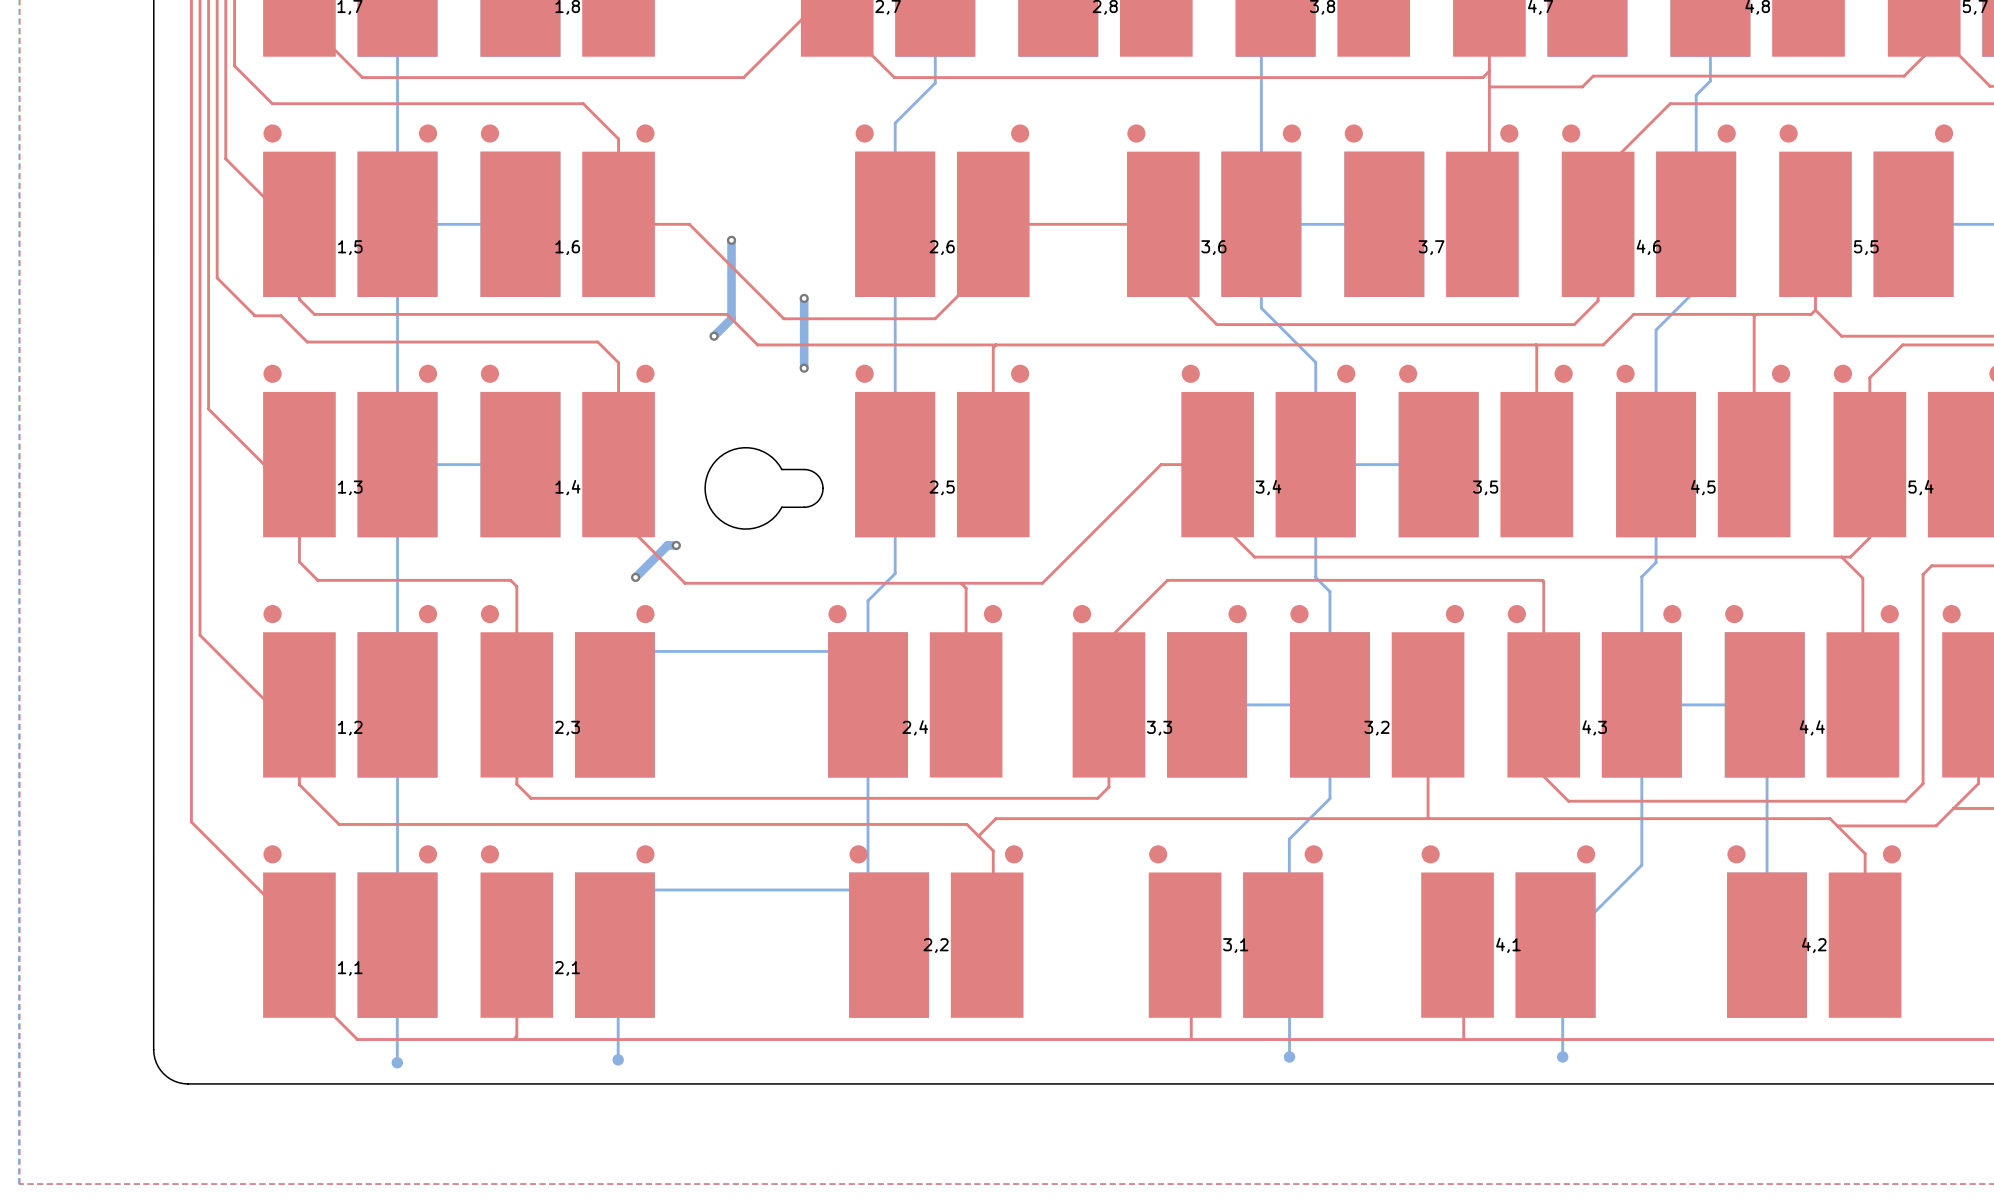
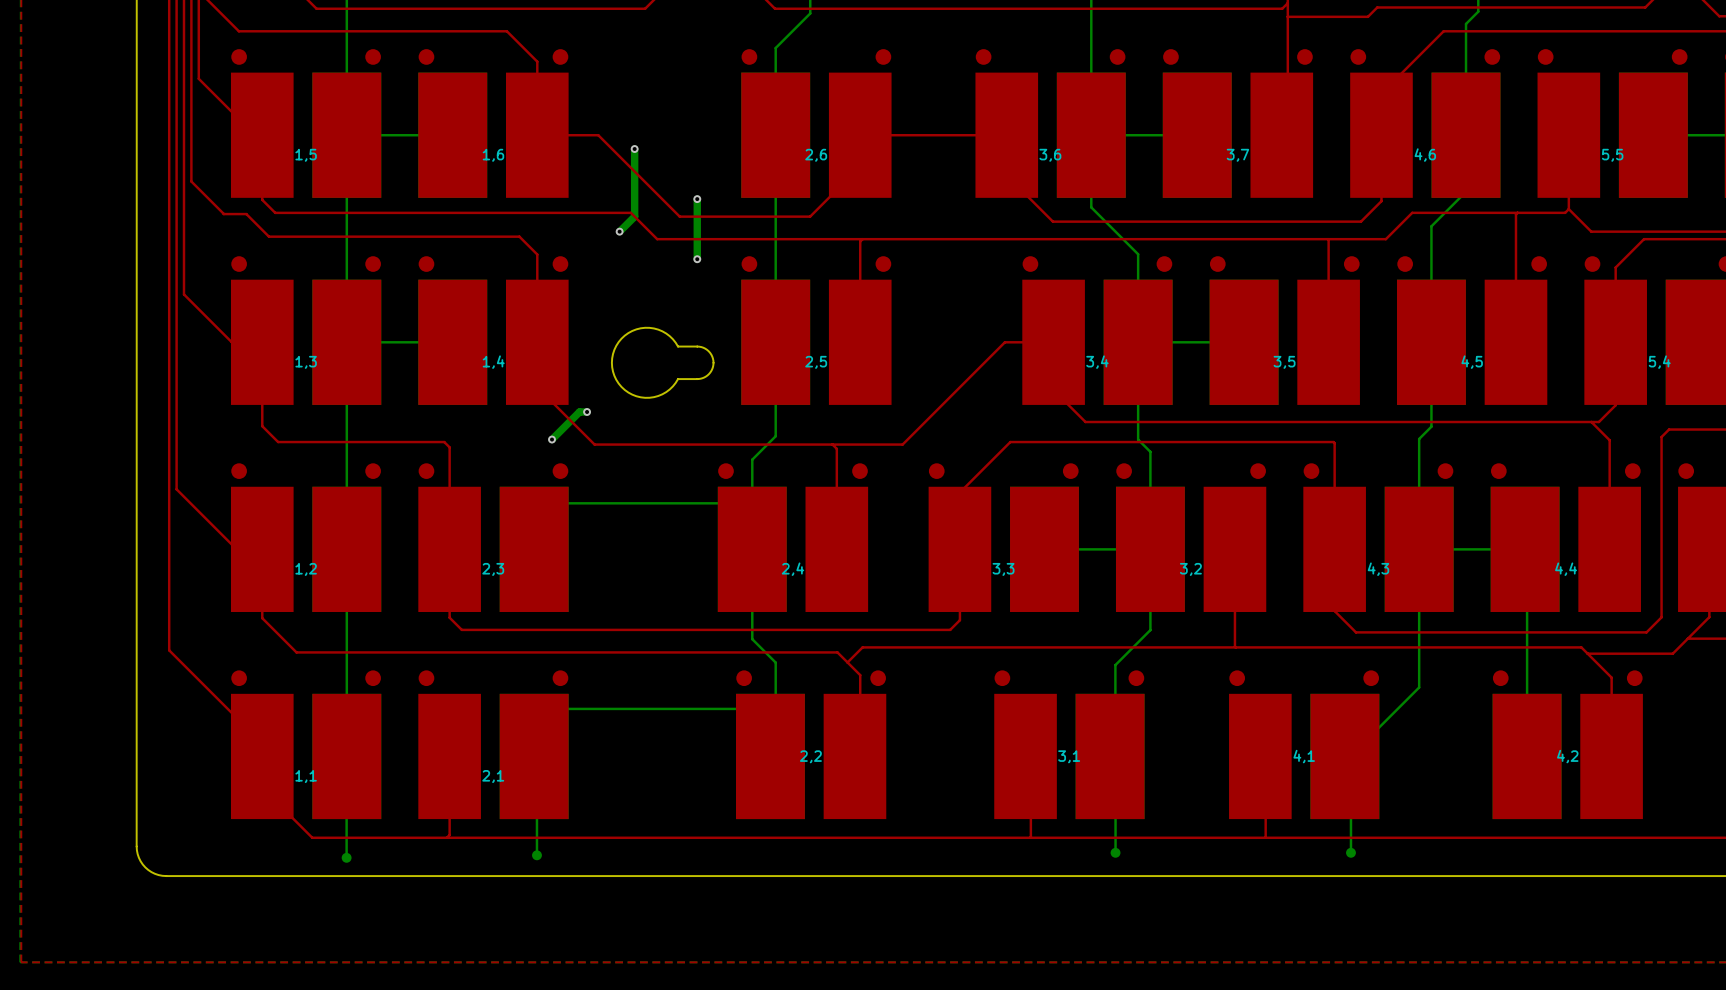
bottom track: (868, 809) (868, 917) -> (752, 639) (775, 662) (775, 756)

